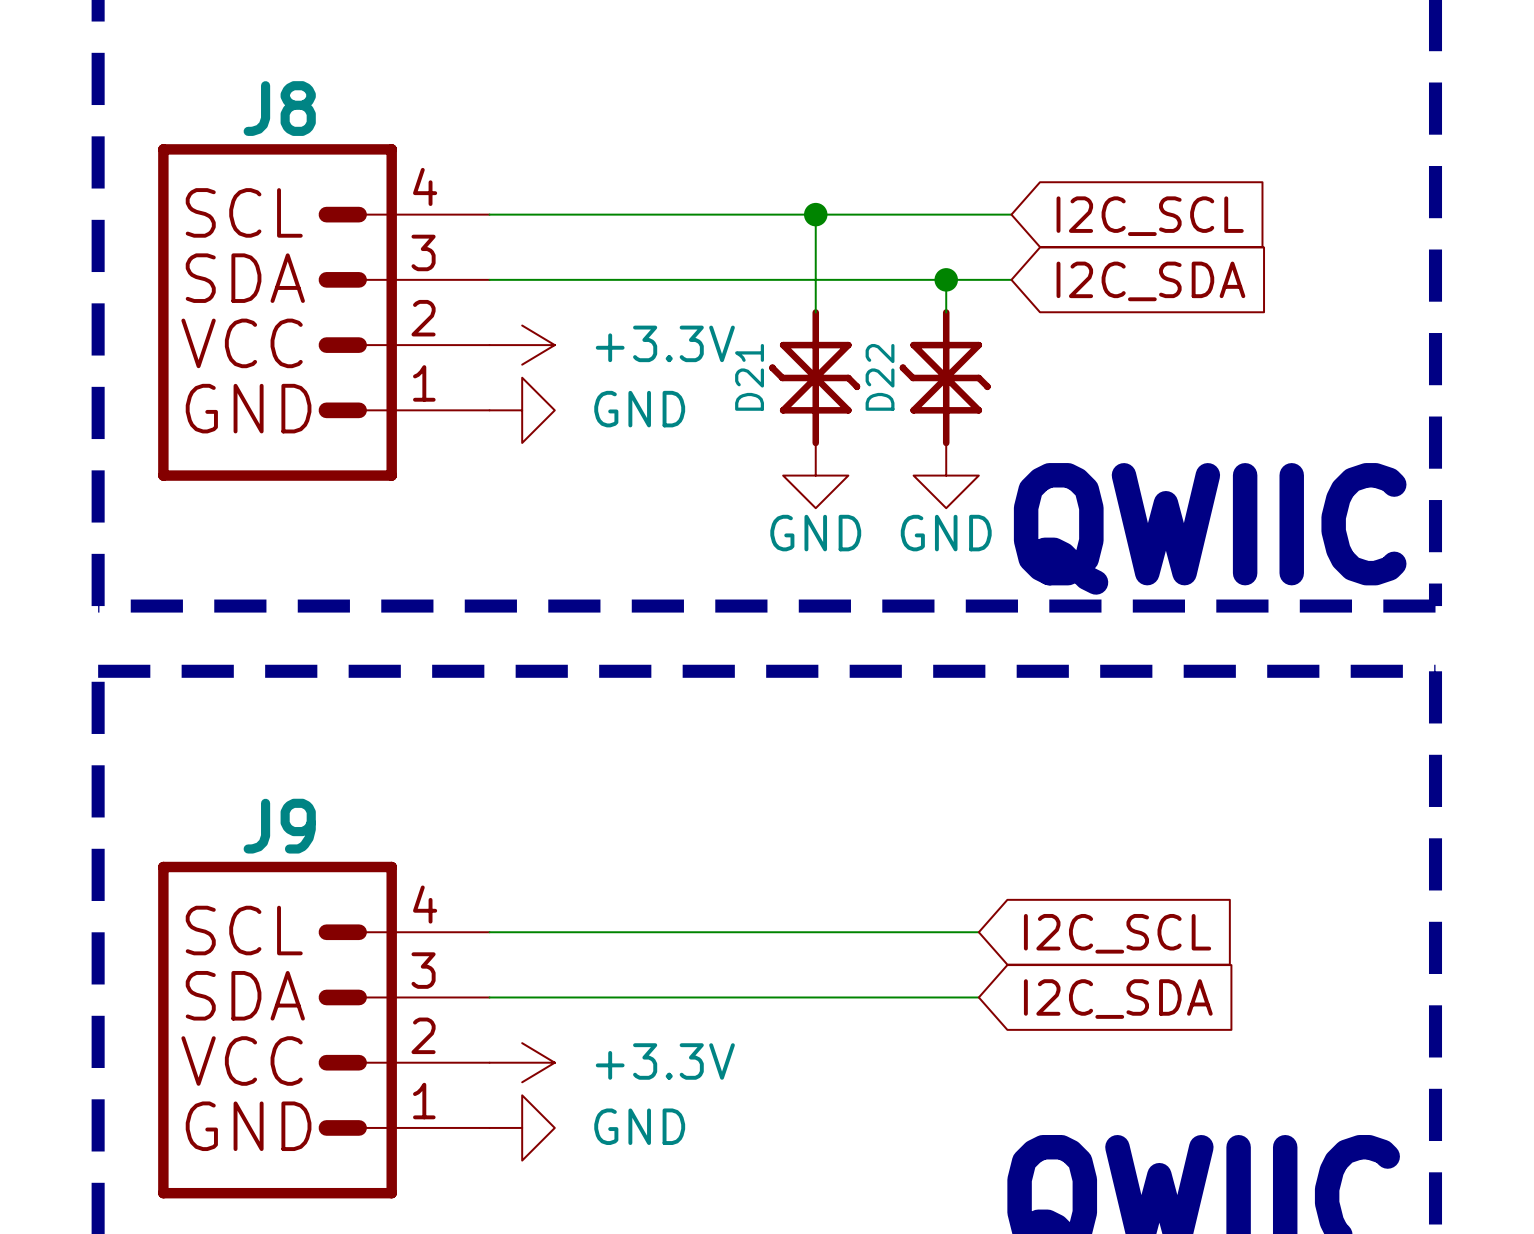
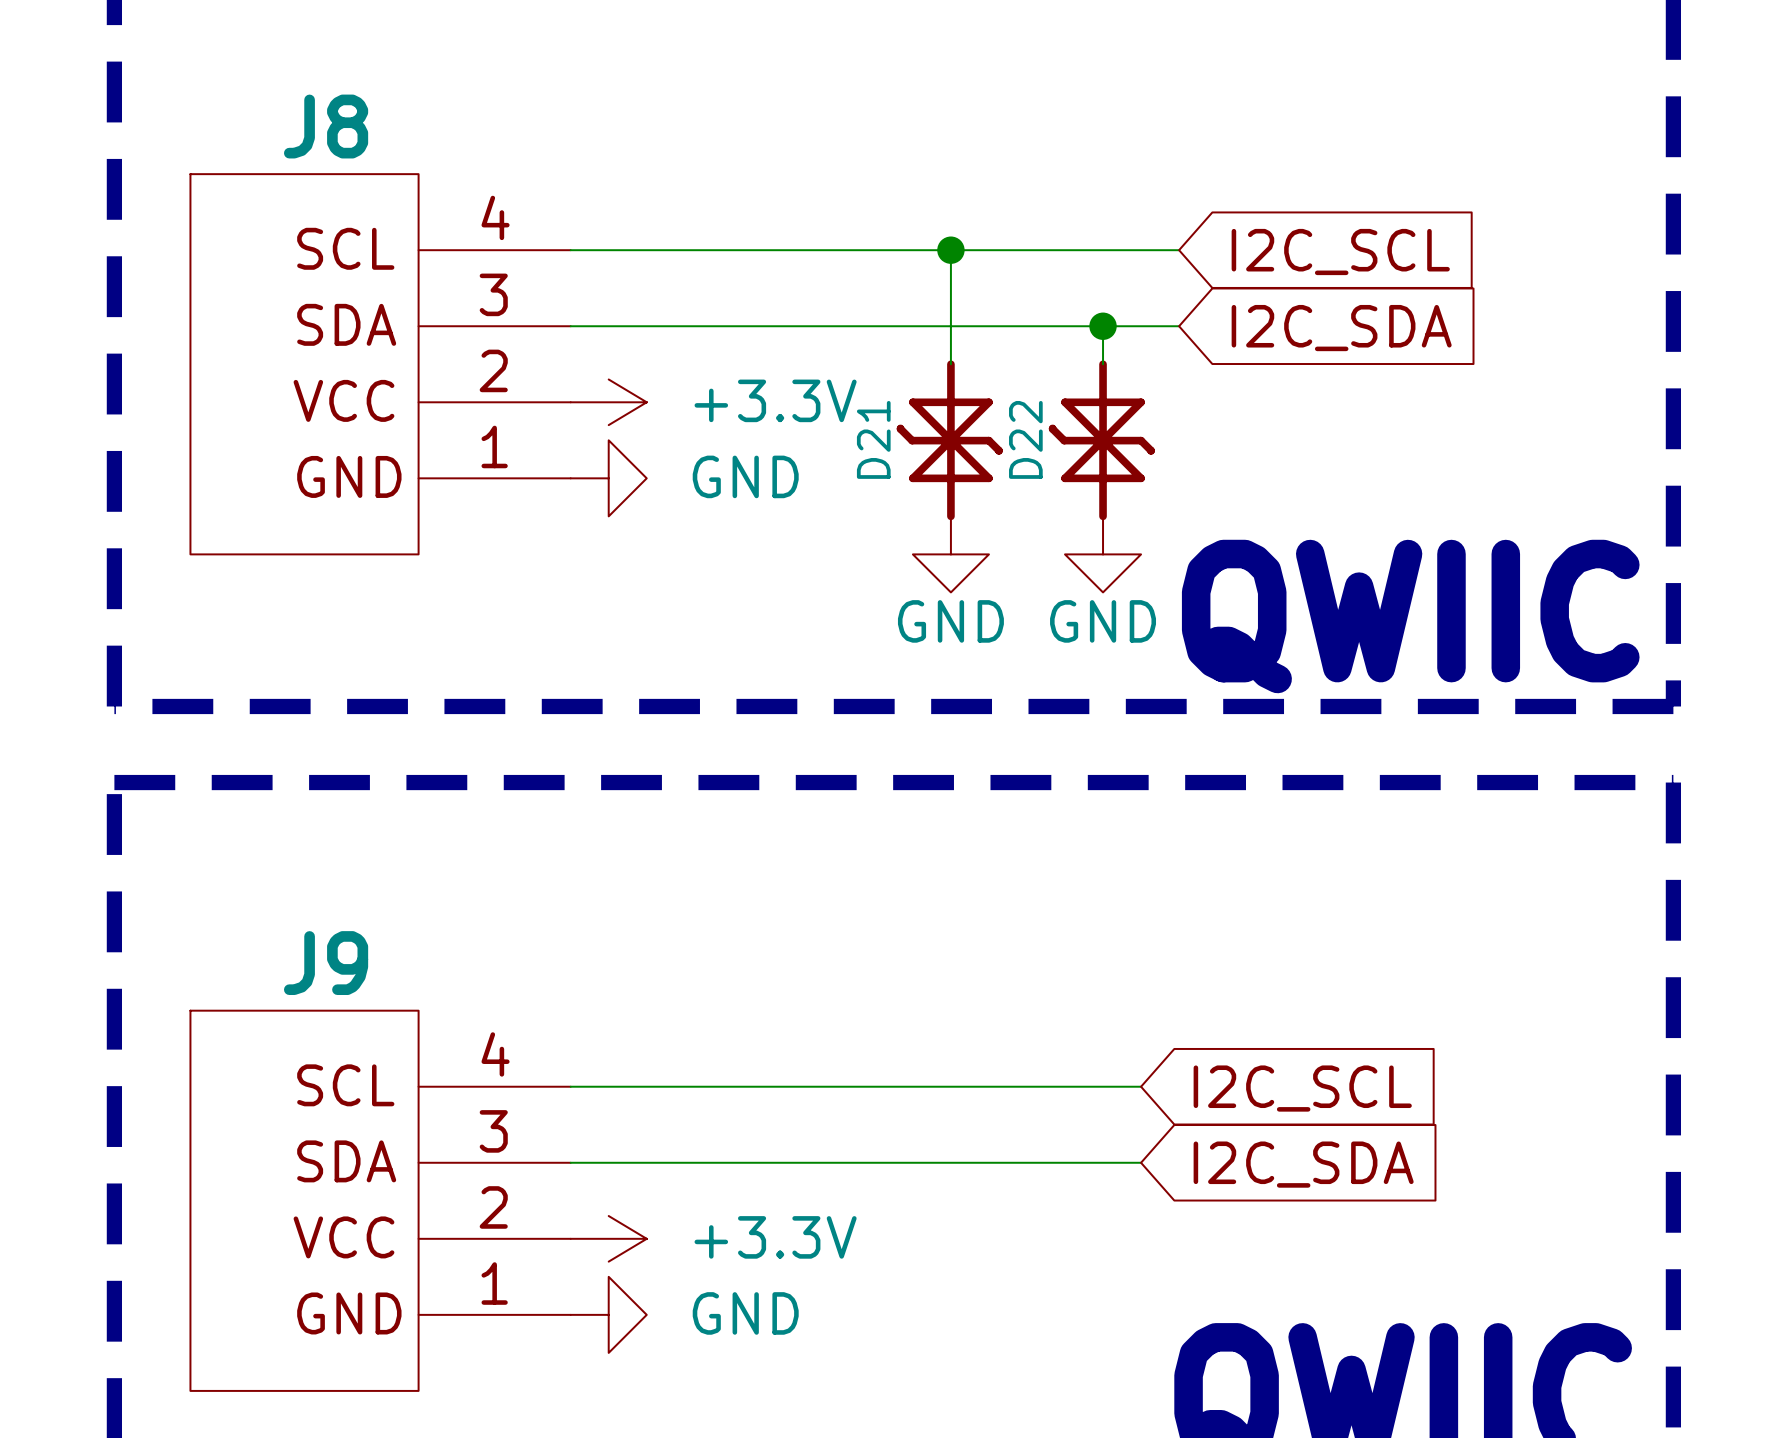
J8 symbol: [158, 144, 490, 481] -> [190, 174, 571, 555]
J9 symbol: [158, 861, 490, 1199] -> [190, 1010, 571, 1391]

